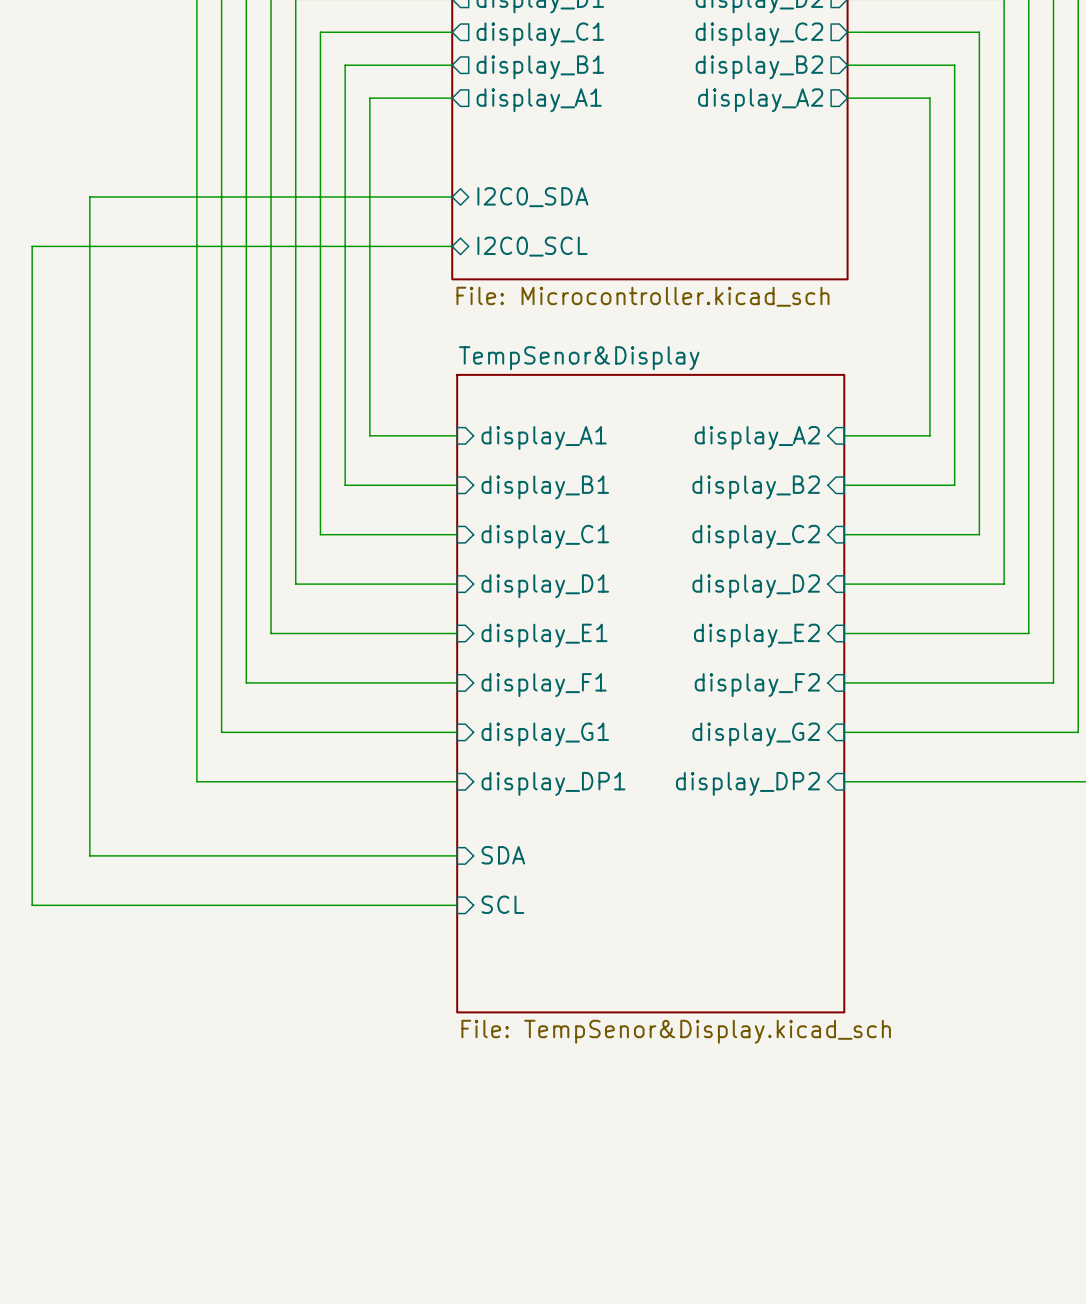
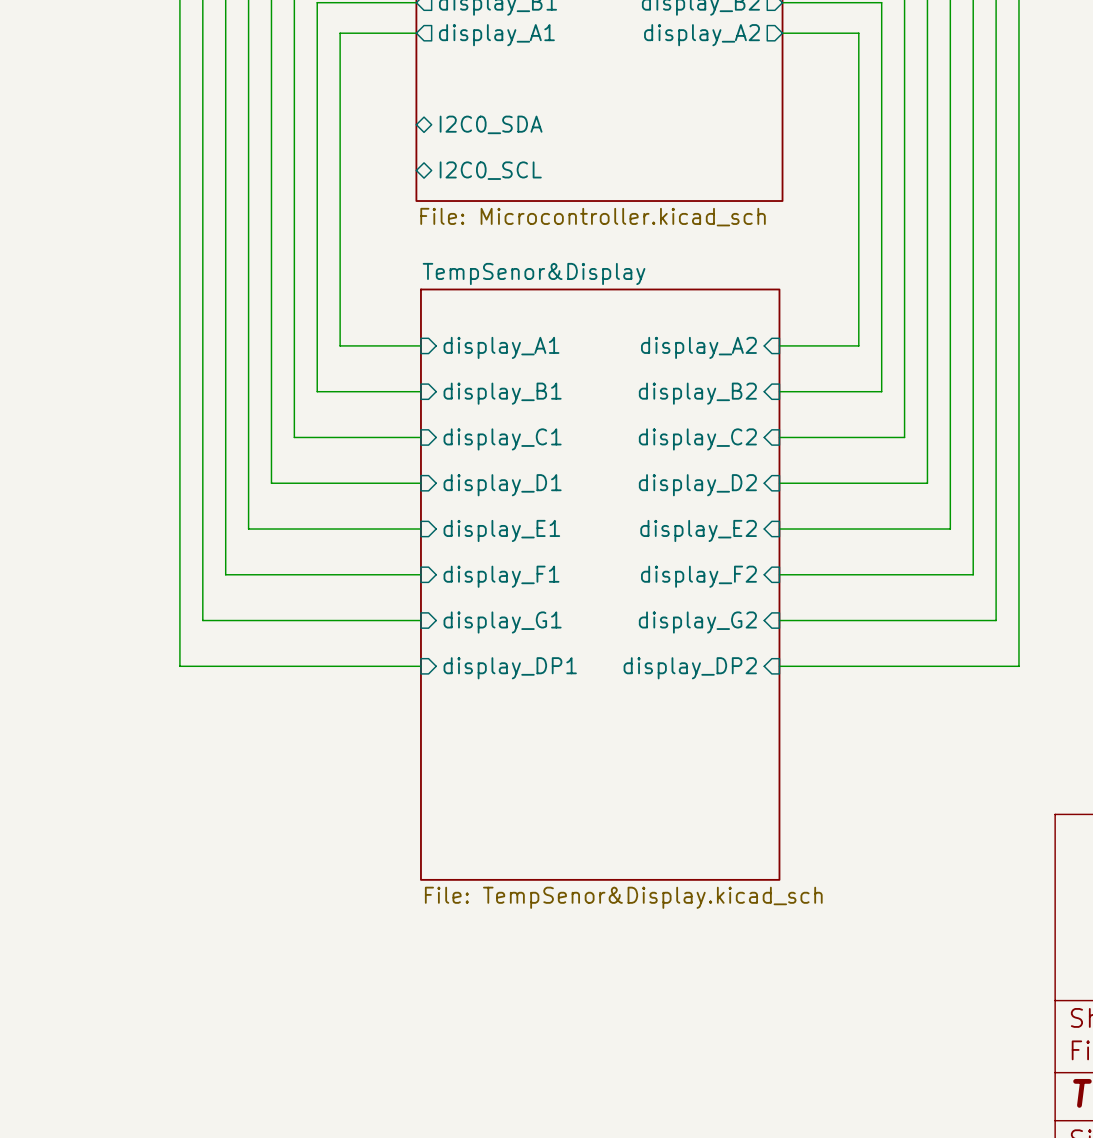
wire: (452, 196) (89, 196) (89, 855) (457, 855) -> none
wire: (452, 246) (32, 246) (32, 905) (457, 905) -> none
sheet pin: SDA (503, 855) -> none
sheet pin: SCL (502, 904) -> none

